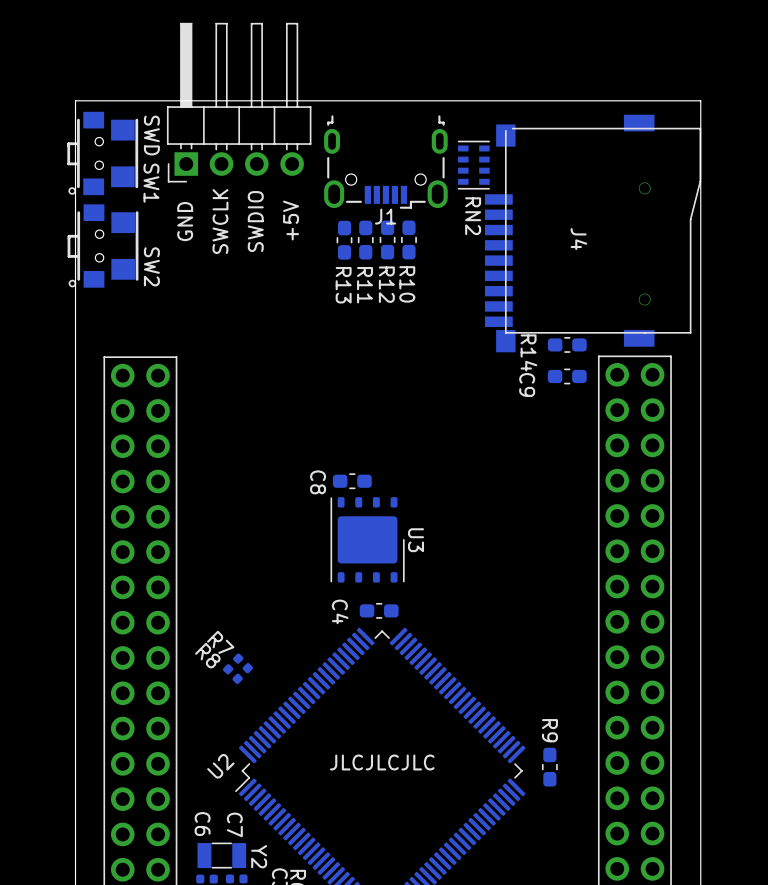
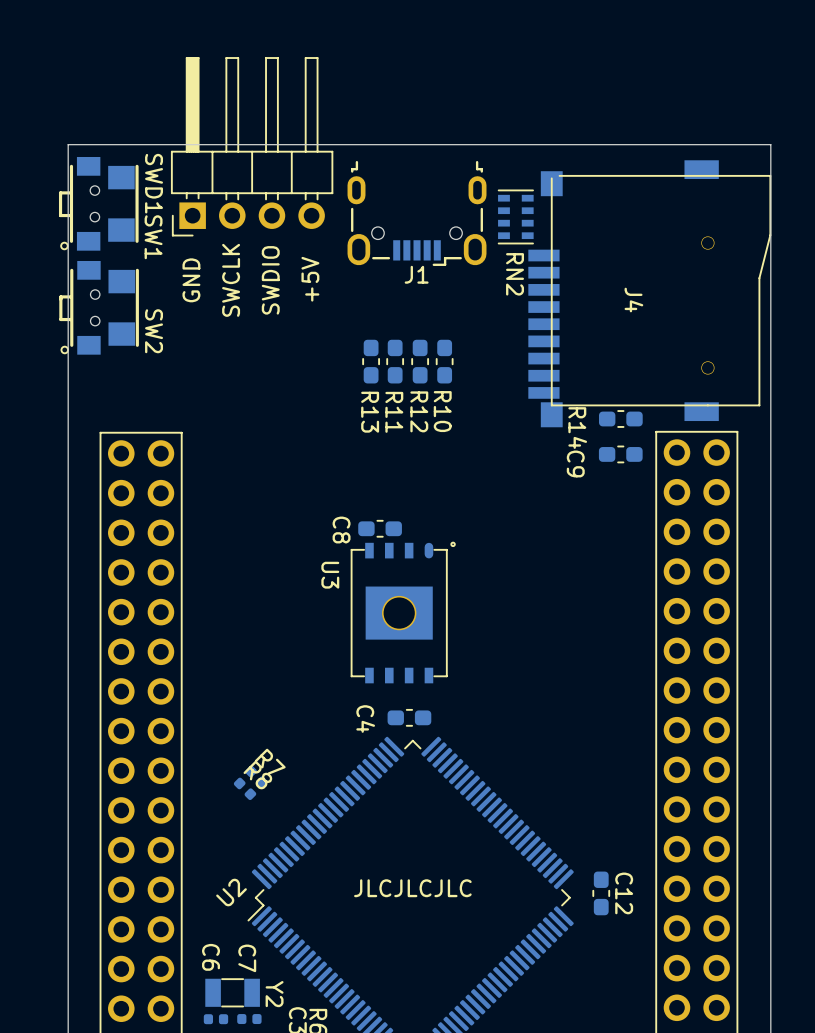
SWD name: SWD (151, 135) -> SWD1 (154, 183)
R12 position: (387, 239) -> (420, 361)
R10 position: (408, 239) -> (444, 361)
R13 position: (344, 240) -> (371, 361)
R11 position: (365, 240) -> (395, 361)
C8 position: (352, 481) -> (380, 528)
U3 footprint: [330, 497, 405, 583] -> [350, 541, 456, 684]
U3 name position: U3 (416, 540) -> U3 (330, 575)
R7 name position: R7 (220, 642) -> R7 (270, 761)
R8 name position: R8 (207, 655) -> R8 (257, 774)
R9 name: R9 (549, 730) -> C12 (624, 893)

